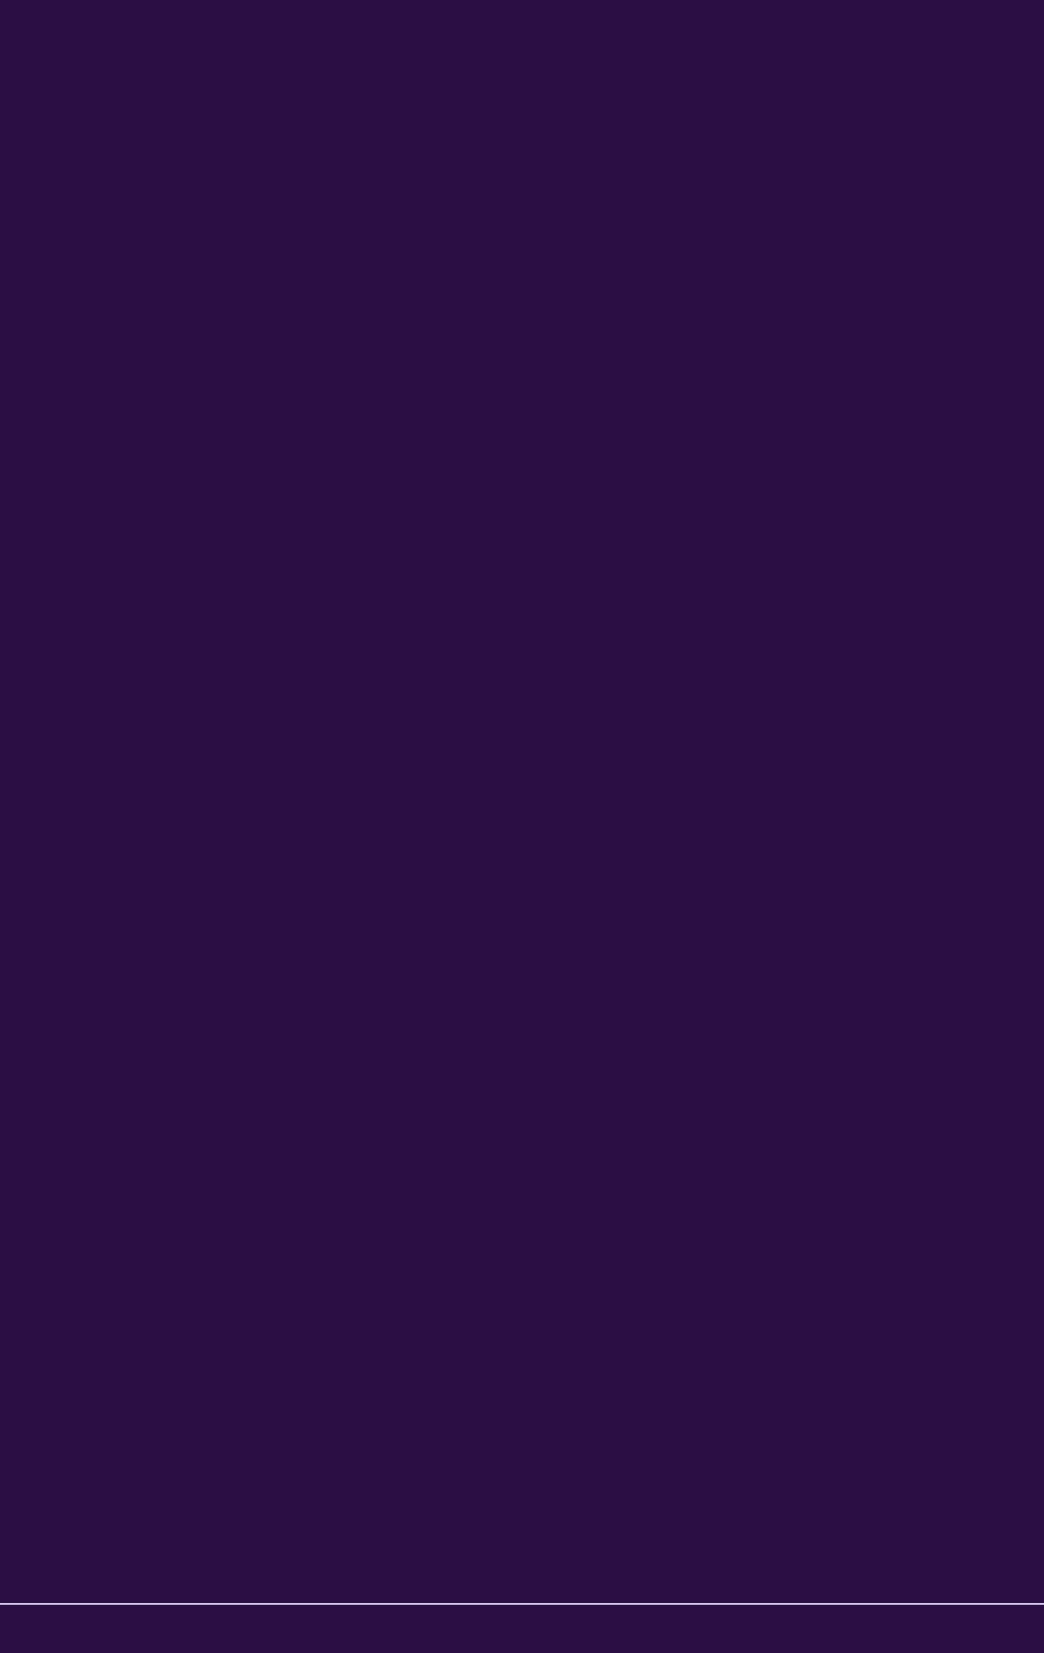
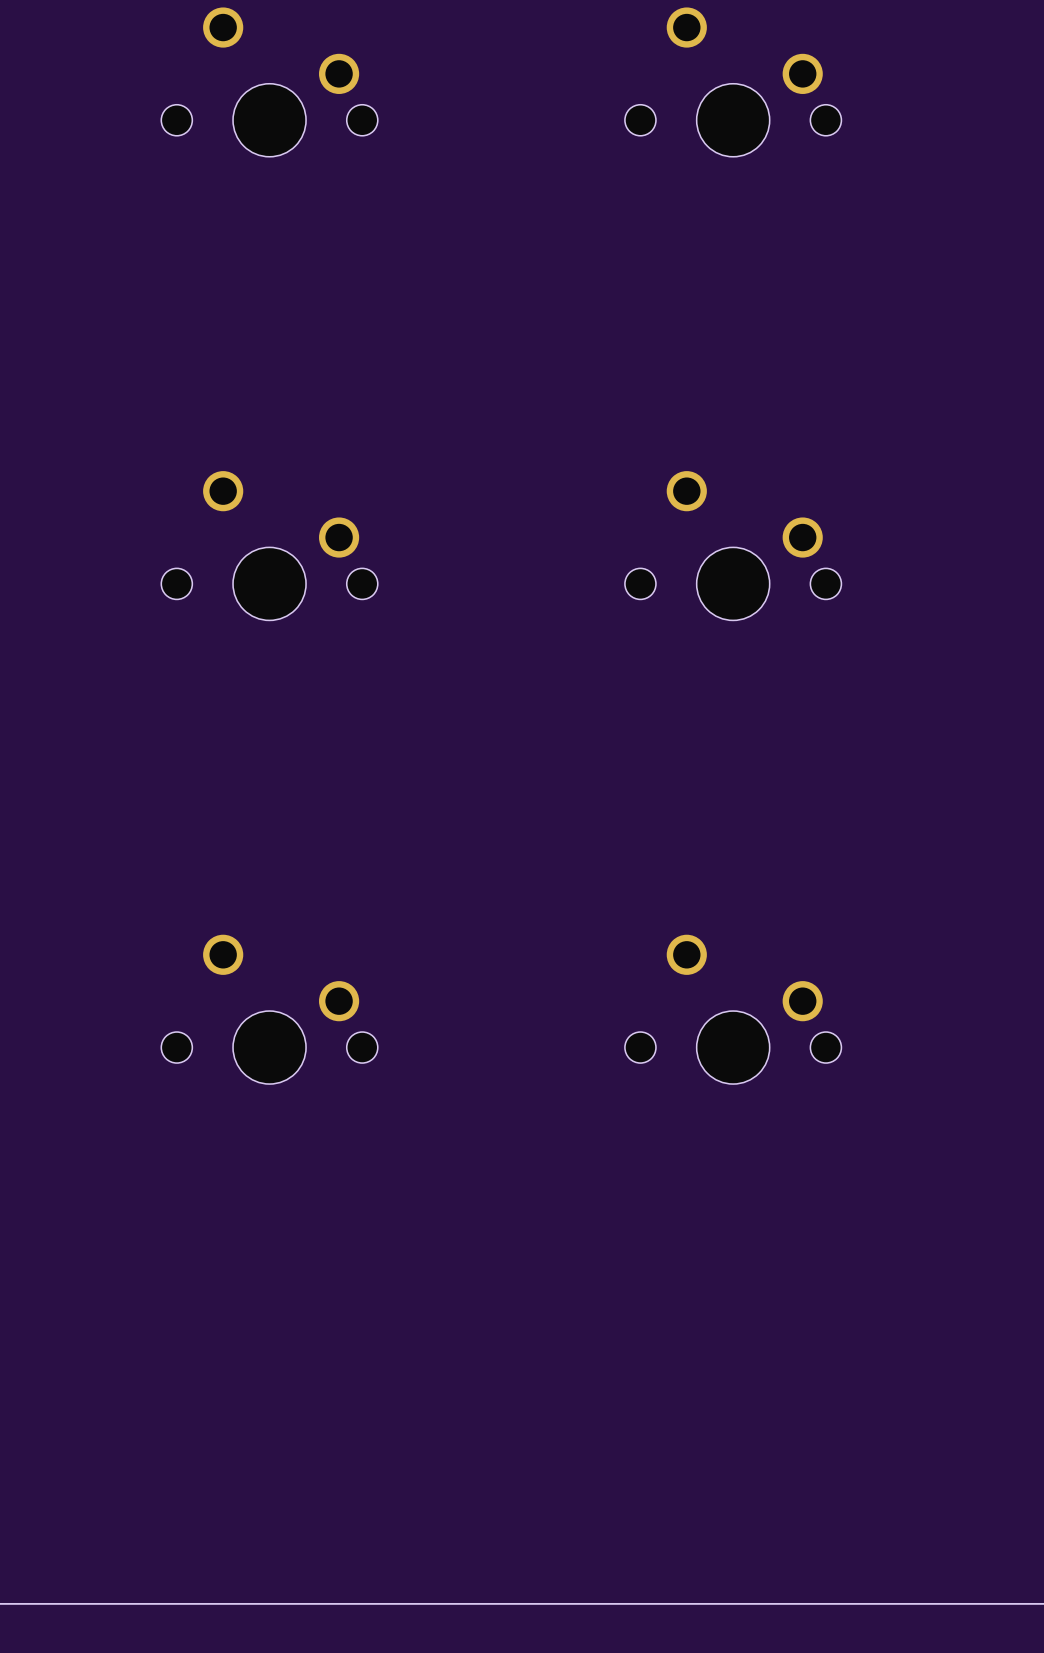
part: none -> (269, 82)
part: none -> (733, 82)
part: none -> (269, 545)
part: none -> (733, 545)
part: none -> (269, 1009)
part: none -> (733, 1009)

